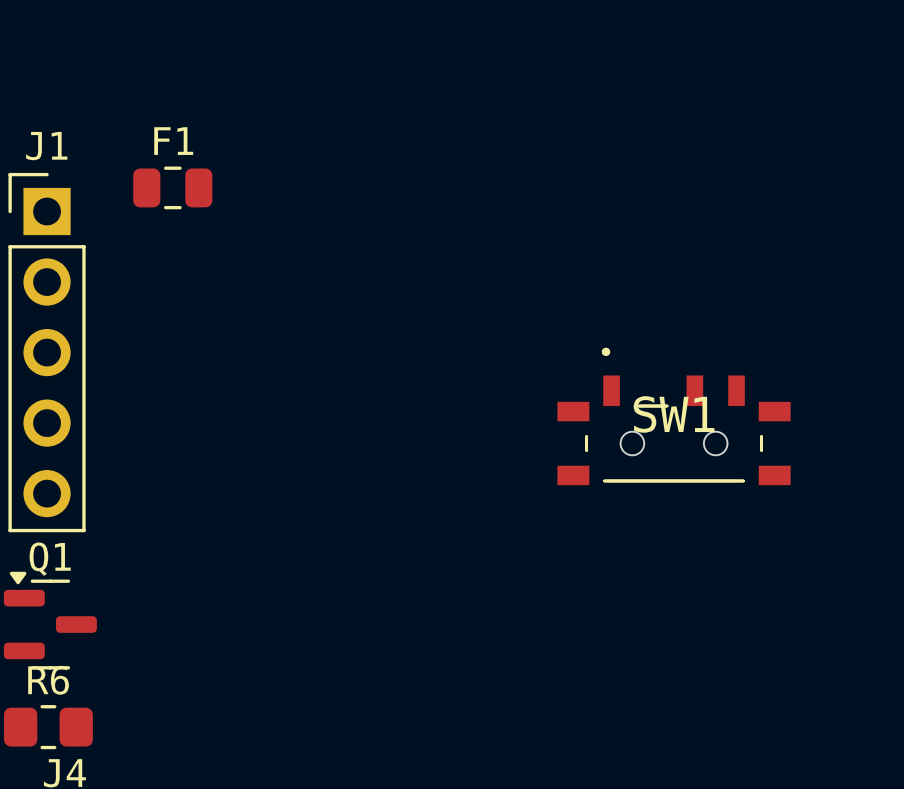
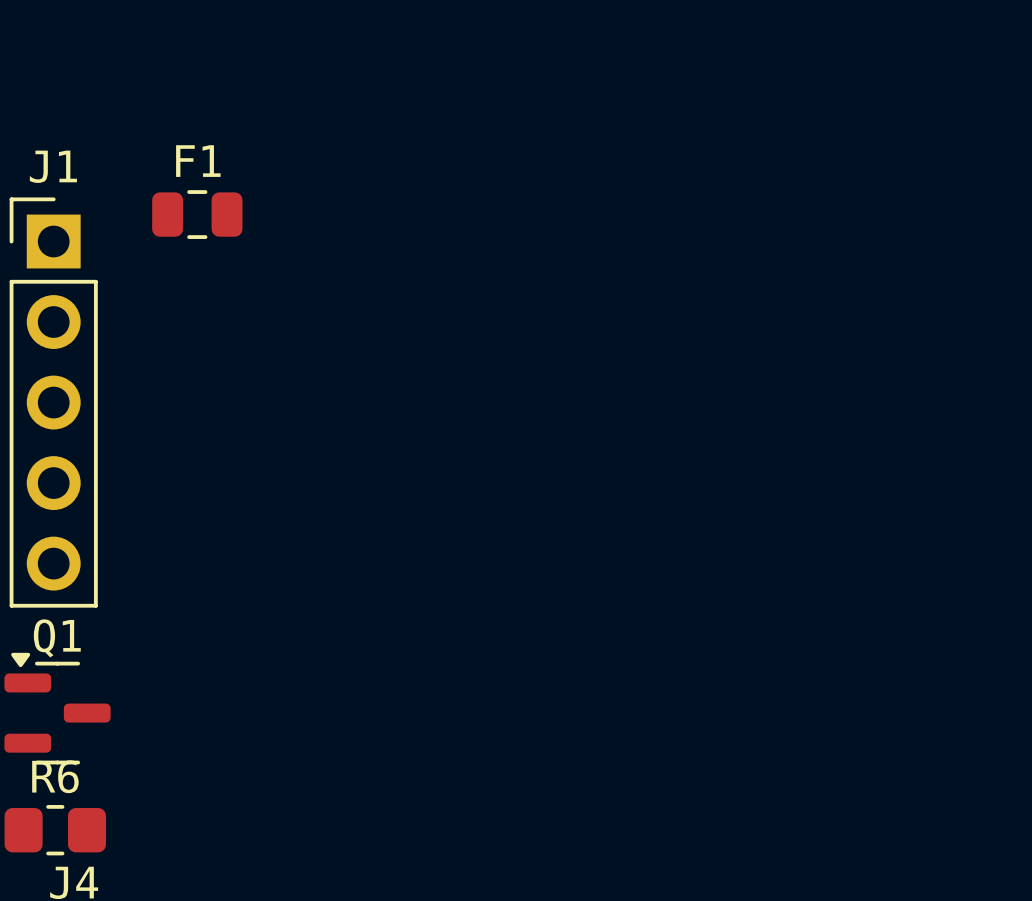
SW1: (674, 416) -> none

